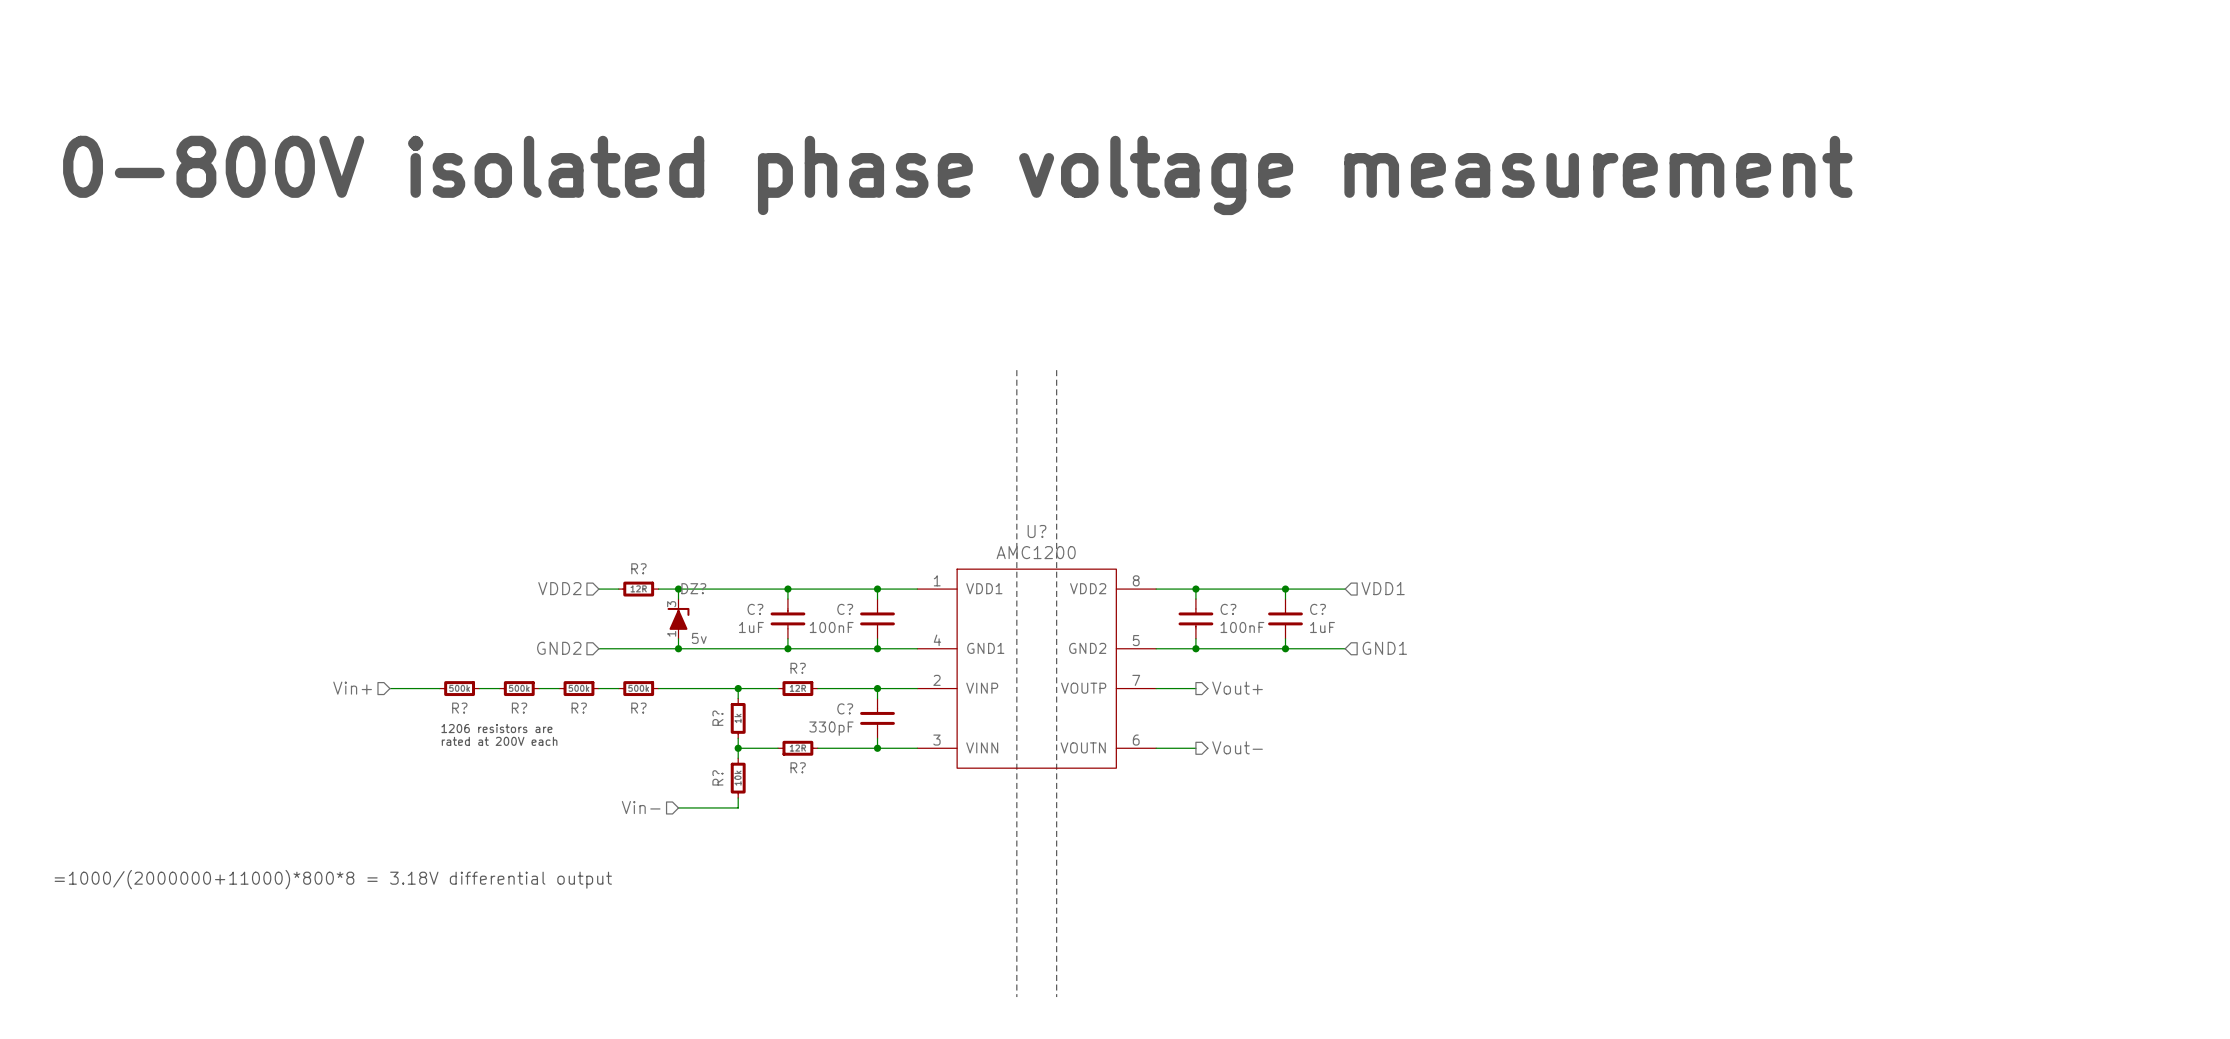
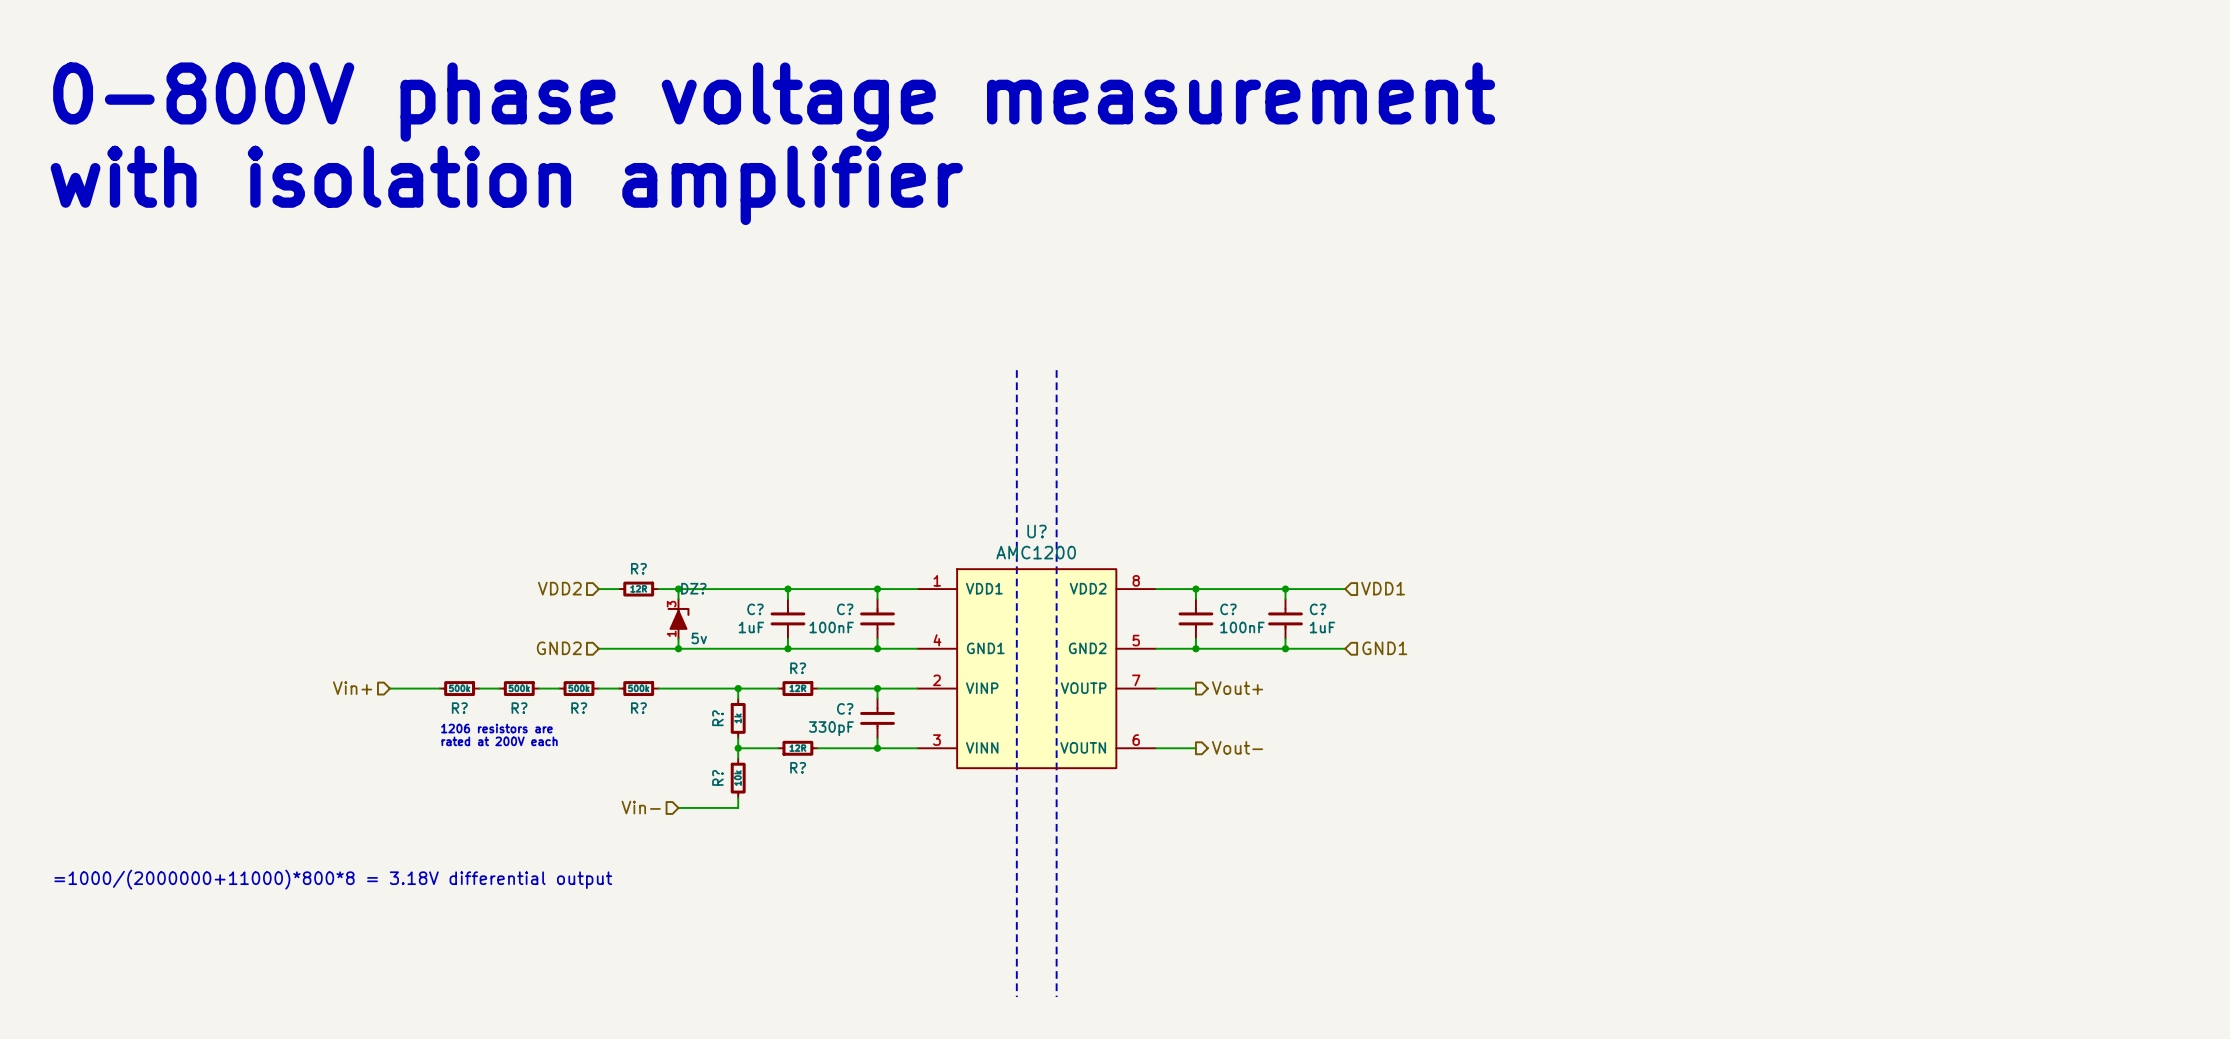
text: 0-800V isolated phase voltage measurement (957, 175) -> 0-800V phase voltage measurement (774, 102)
text: none -> with isolation amplifier (506, 185)

